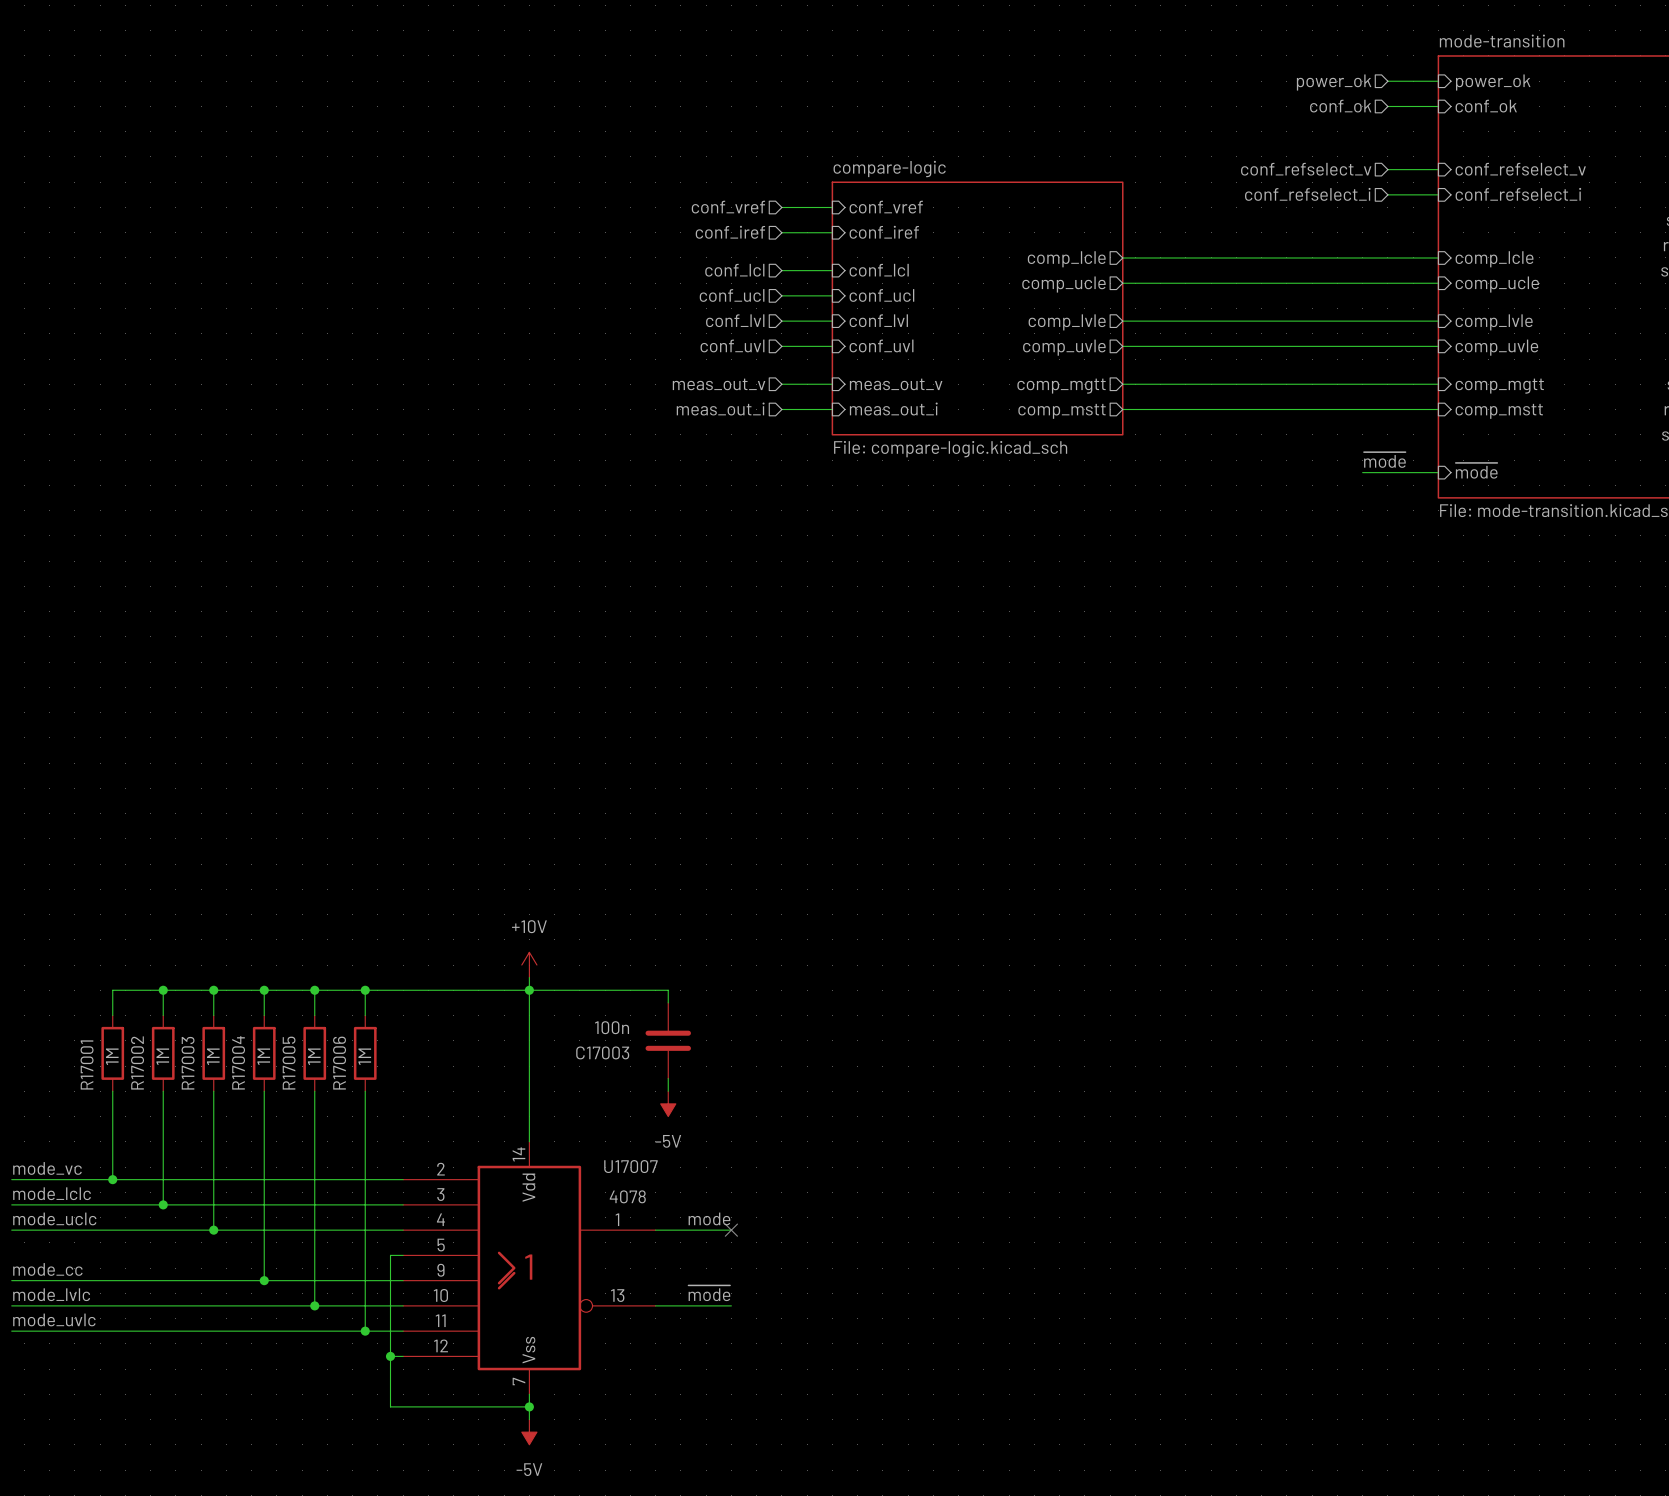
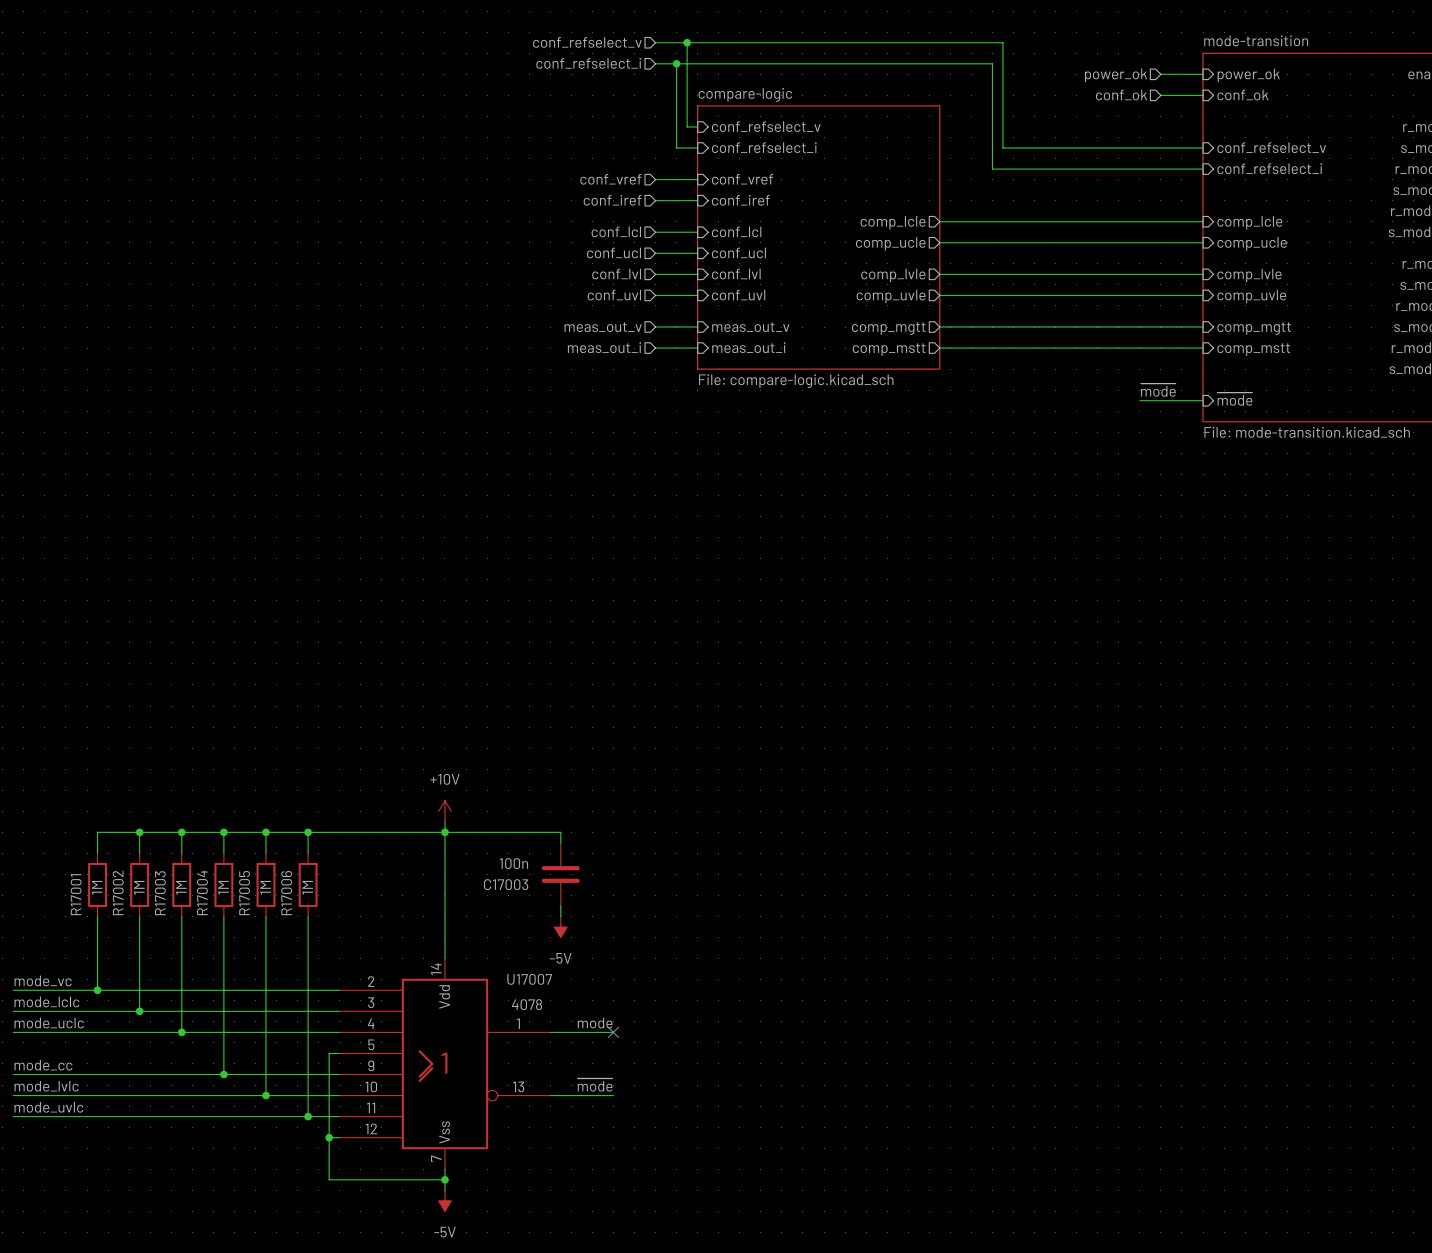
hierarchical label: none -> conf_refselect_v (587, 42)
wire: none -> (655, 42) (1002, 42) (1002, 148) (1160, 148)
wire: none -> (687, 42) (687, 126) (697, 126)
junction: none -> (687, 42)
hierarchical label: none -> conf_refselect_i (588, 63)
wire: none -> (655, 63) (992, 63) (992, 169) (1160, 169)
wire: none -> (676, 63) (676, 148) (697, 148)
junction: none -> (676, 63)
sheet pin: none -> conf_refselect_v (766, 126)
sheet pin: none -> conf_refselect_i (764, 147)
hierarchical label: conf_refselect_v (1306, 169) -> none
hierarchical label: conf_refselect_i (1307, 194) -> none
sheet compare-logic: none -> File: compare-logic.kicad_sch (818, 237)
sheet compare-logic: File: compare-logic.kicad_sch (977, 308) -> none

